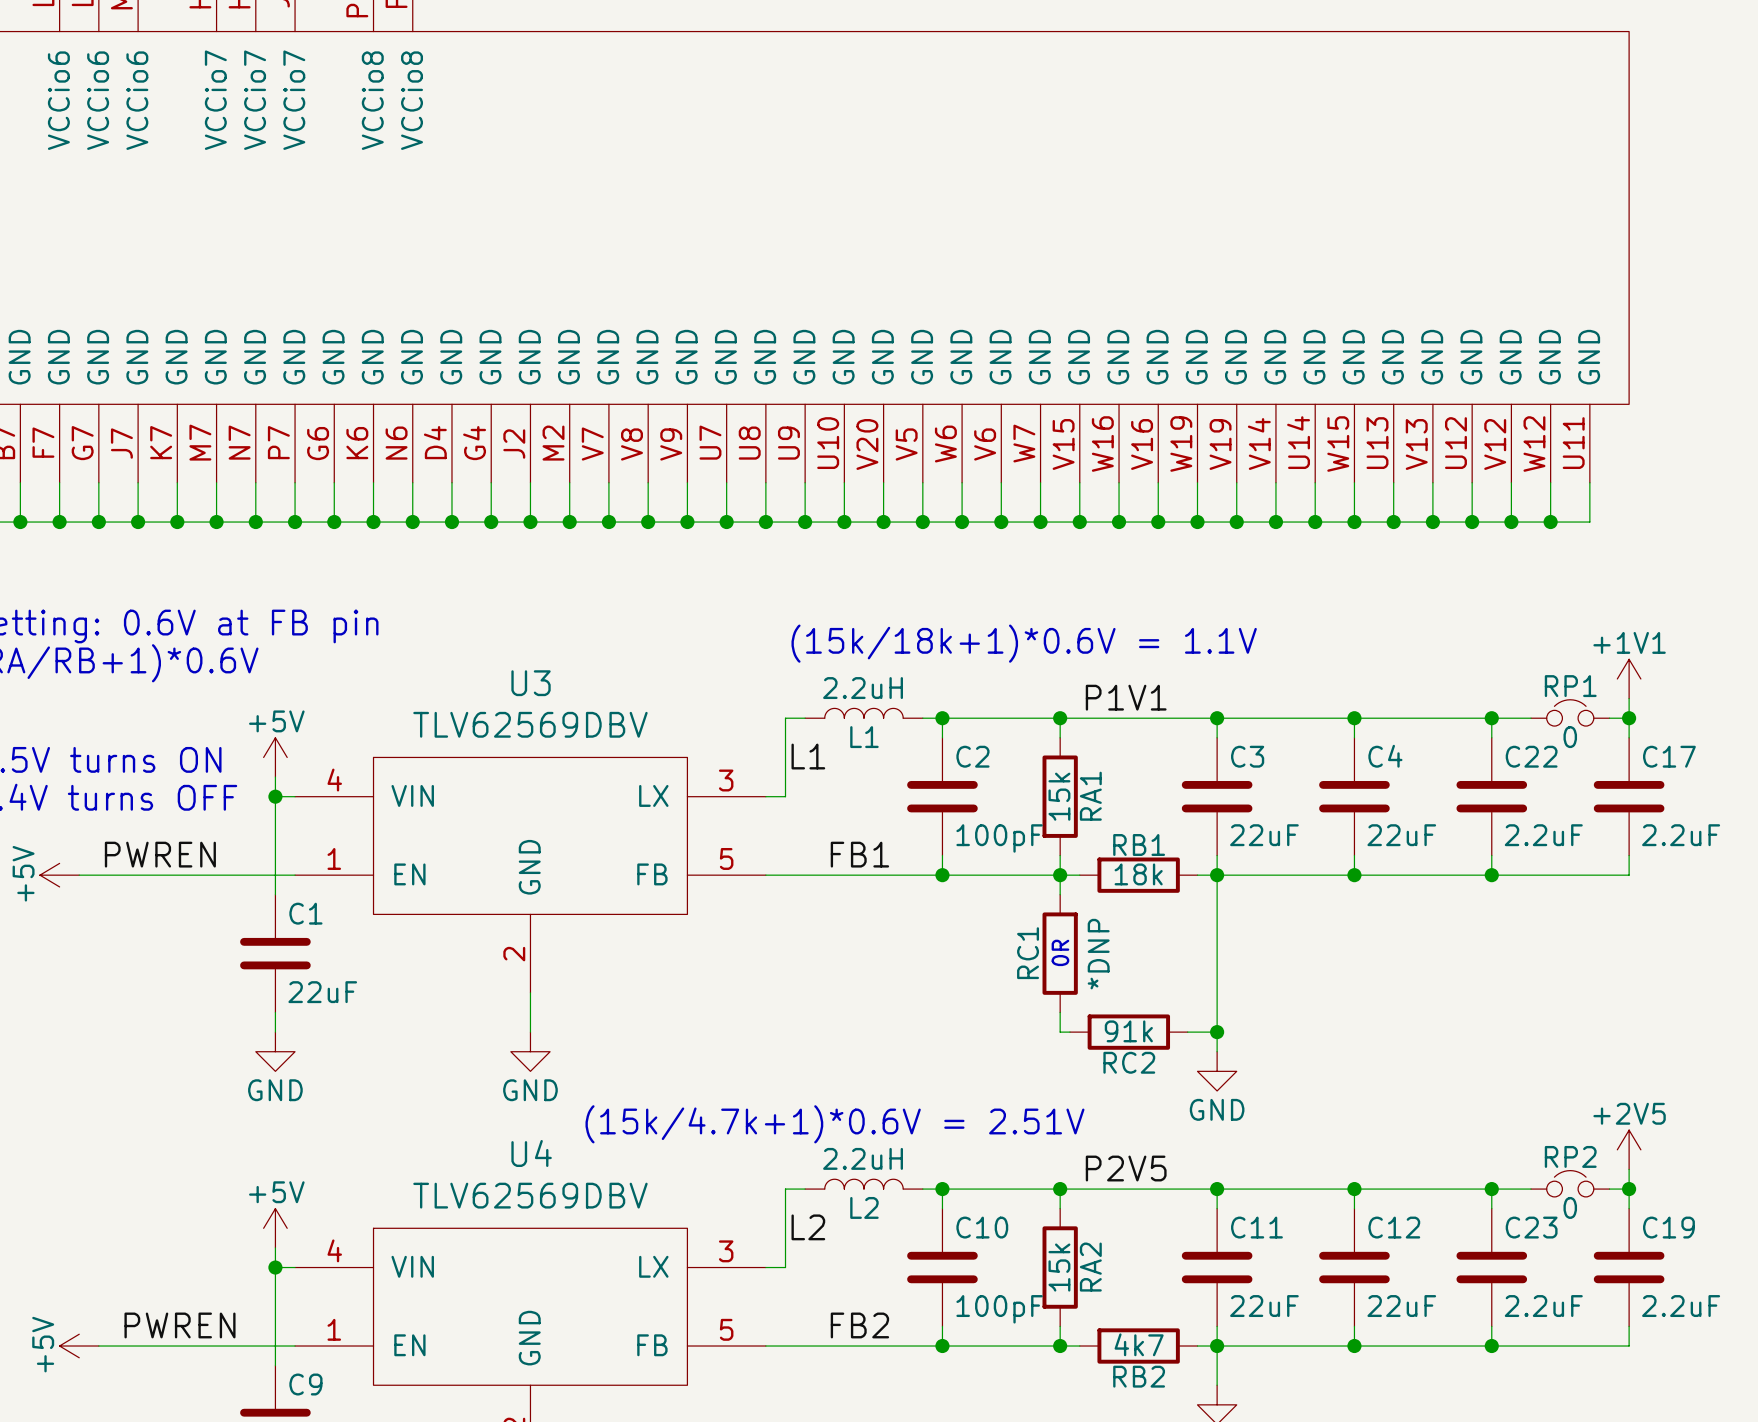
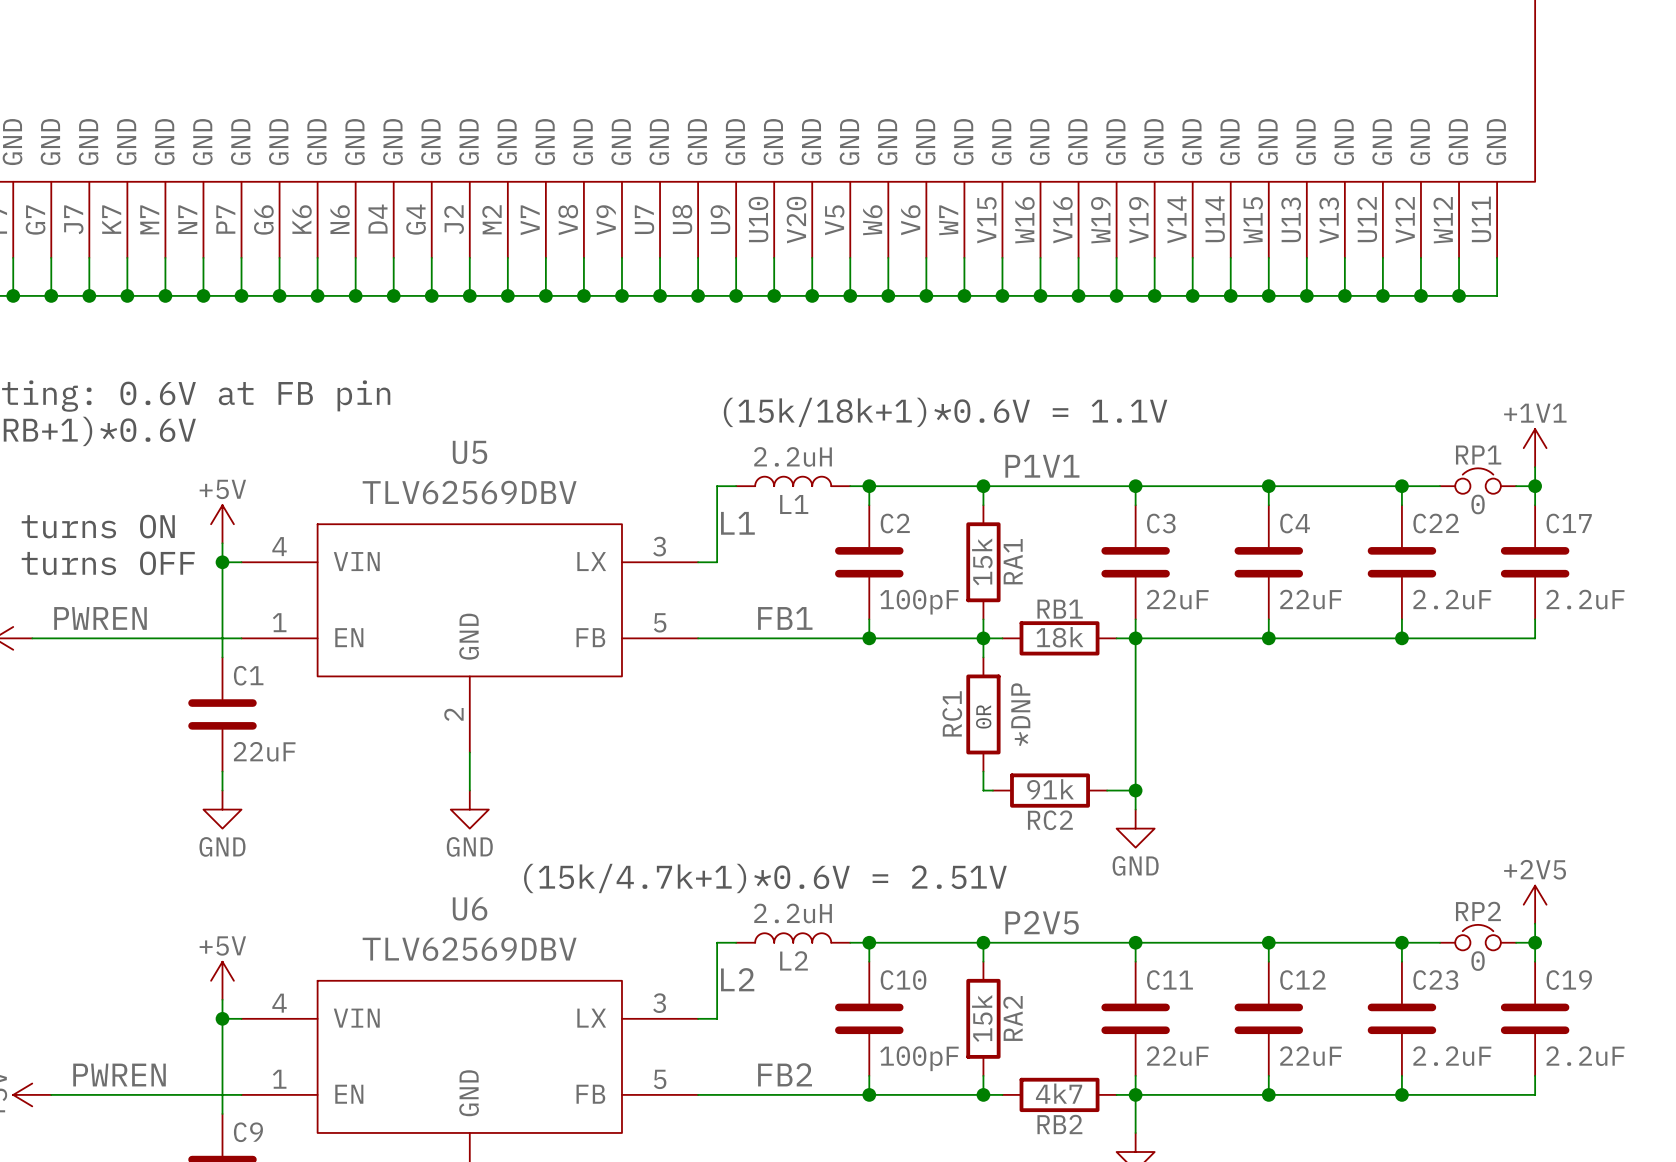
U3 name: U3 (531, 683) -> U5 (470, 452)
U4 name: U4 (531, 1153) -> U6 (470, 908)

